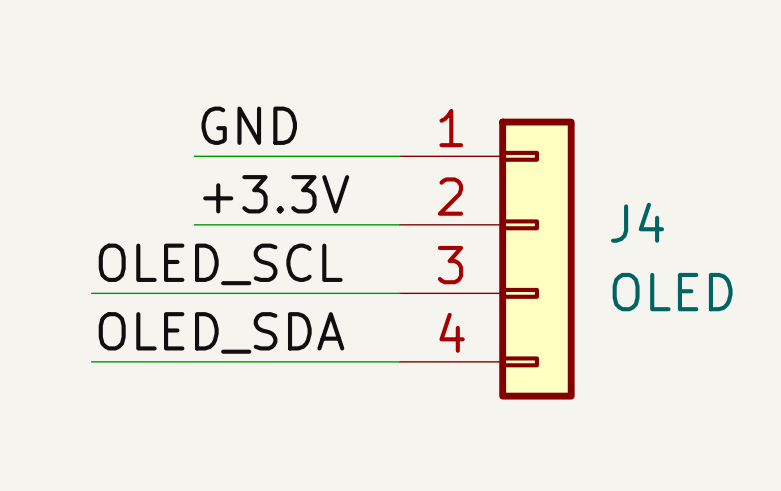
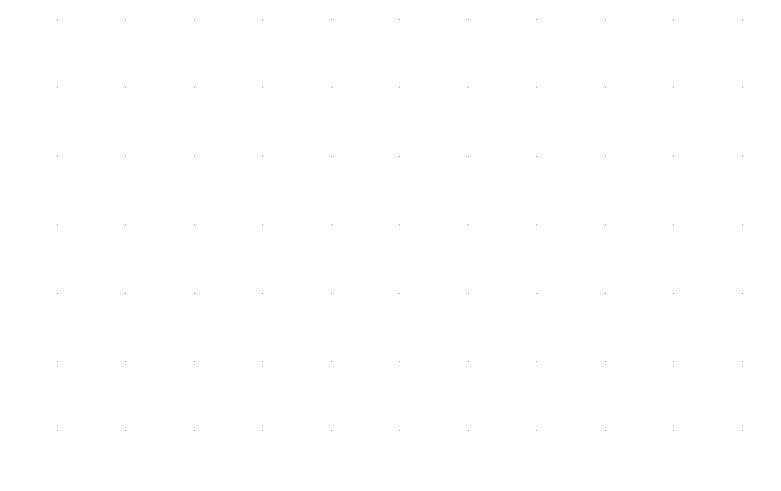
label: GND (249, 125) -> none
wire: (194, 156) (399, 156) -> none
label: +3.3V (276, 194) -> none
wire: (194, 224) (399, 224) -> none
J4: OLED (487, 259) -> none
label: OLED_SCL (220, 264) -> none
wire: (91, 293) (399, 293) -> none
label: OLED_SDA (221, 332) -> none
wire: (91, 361) (399, 361) -> none

